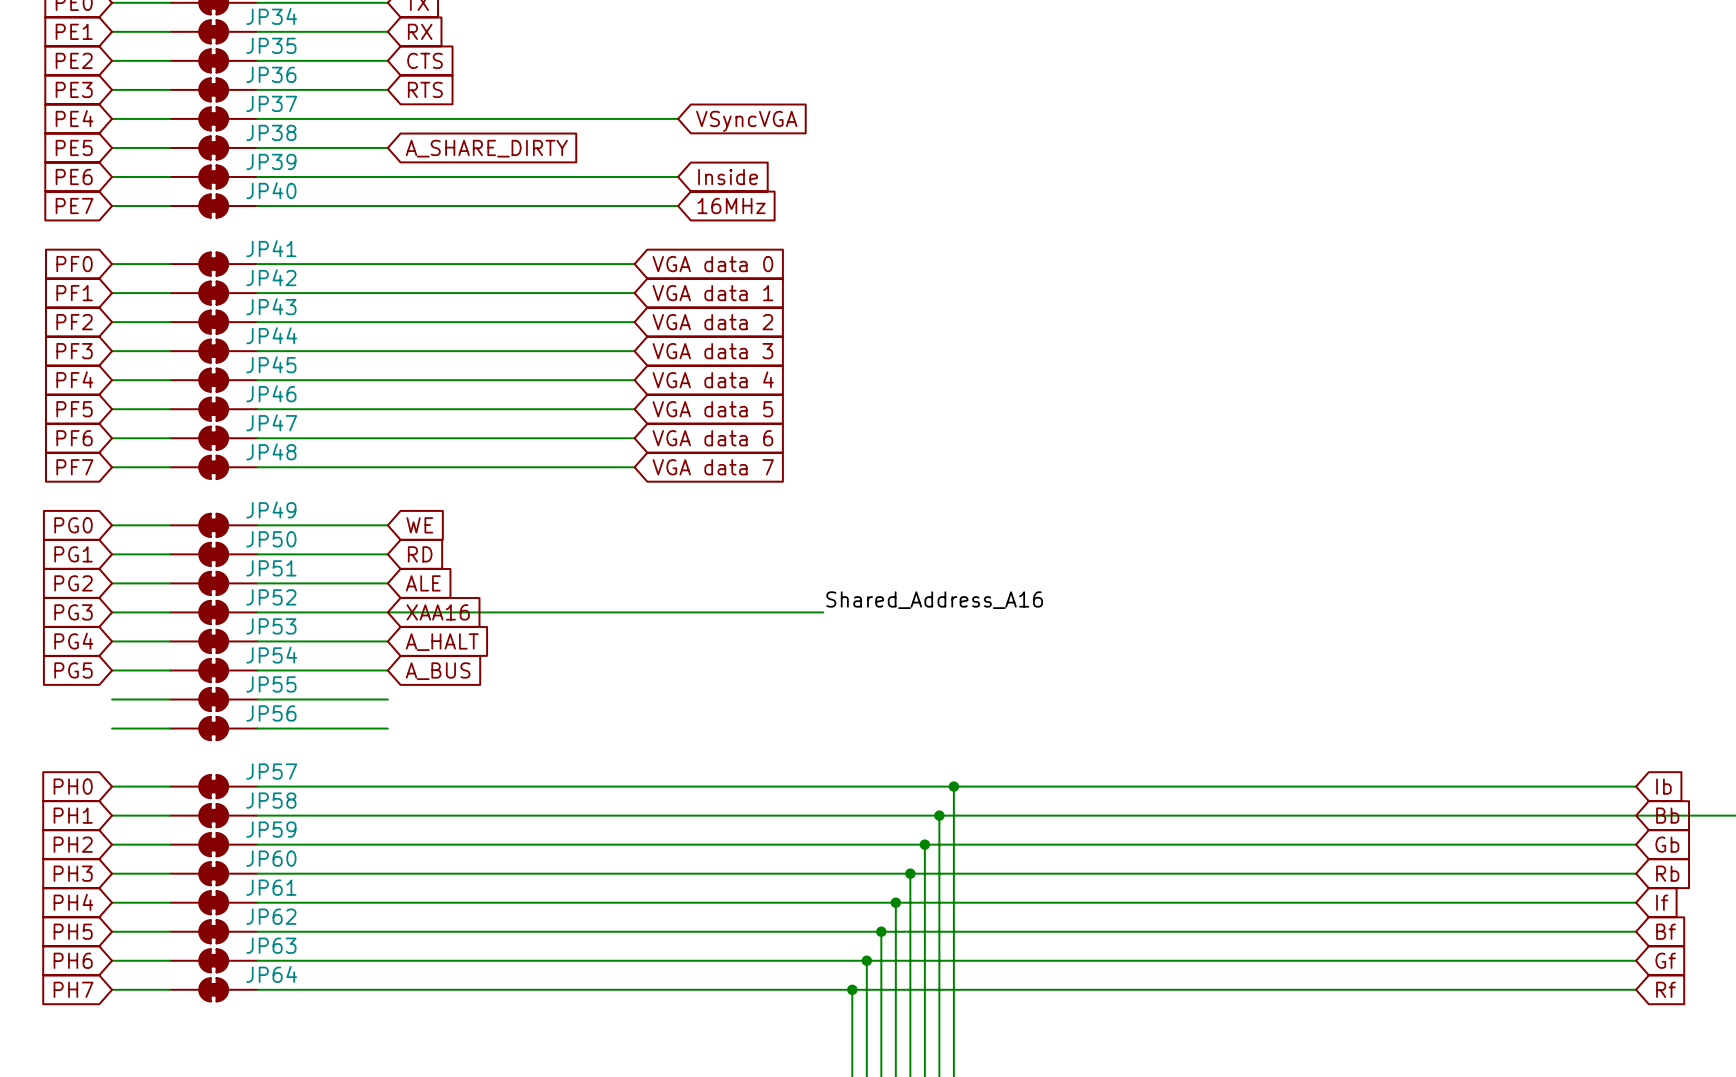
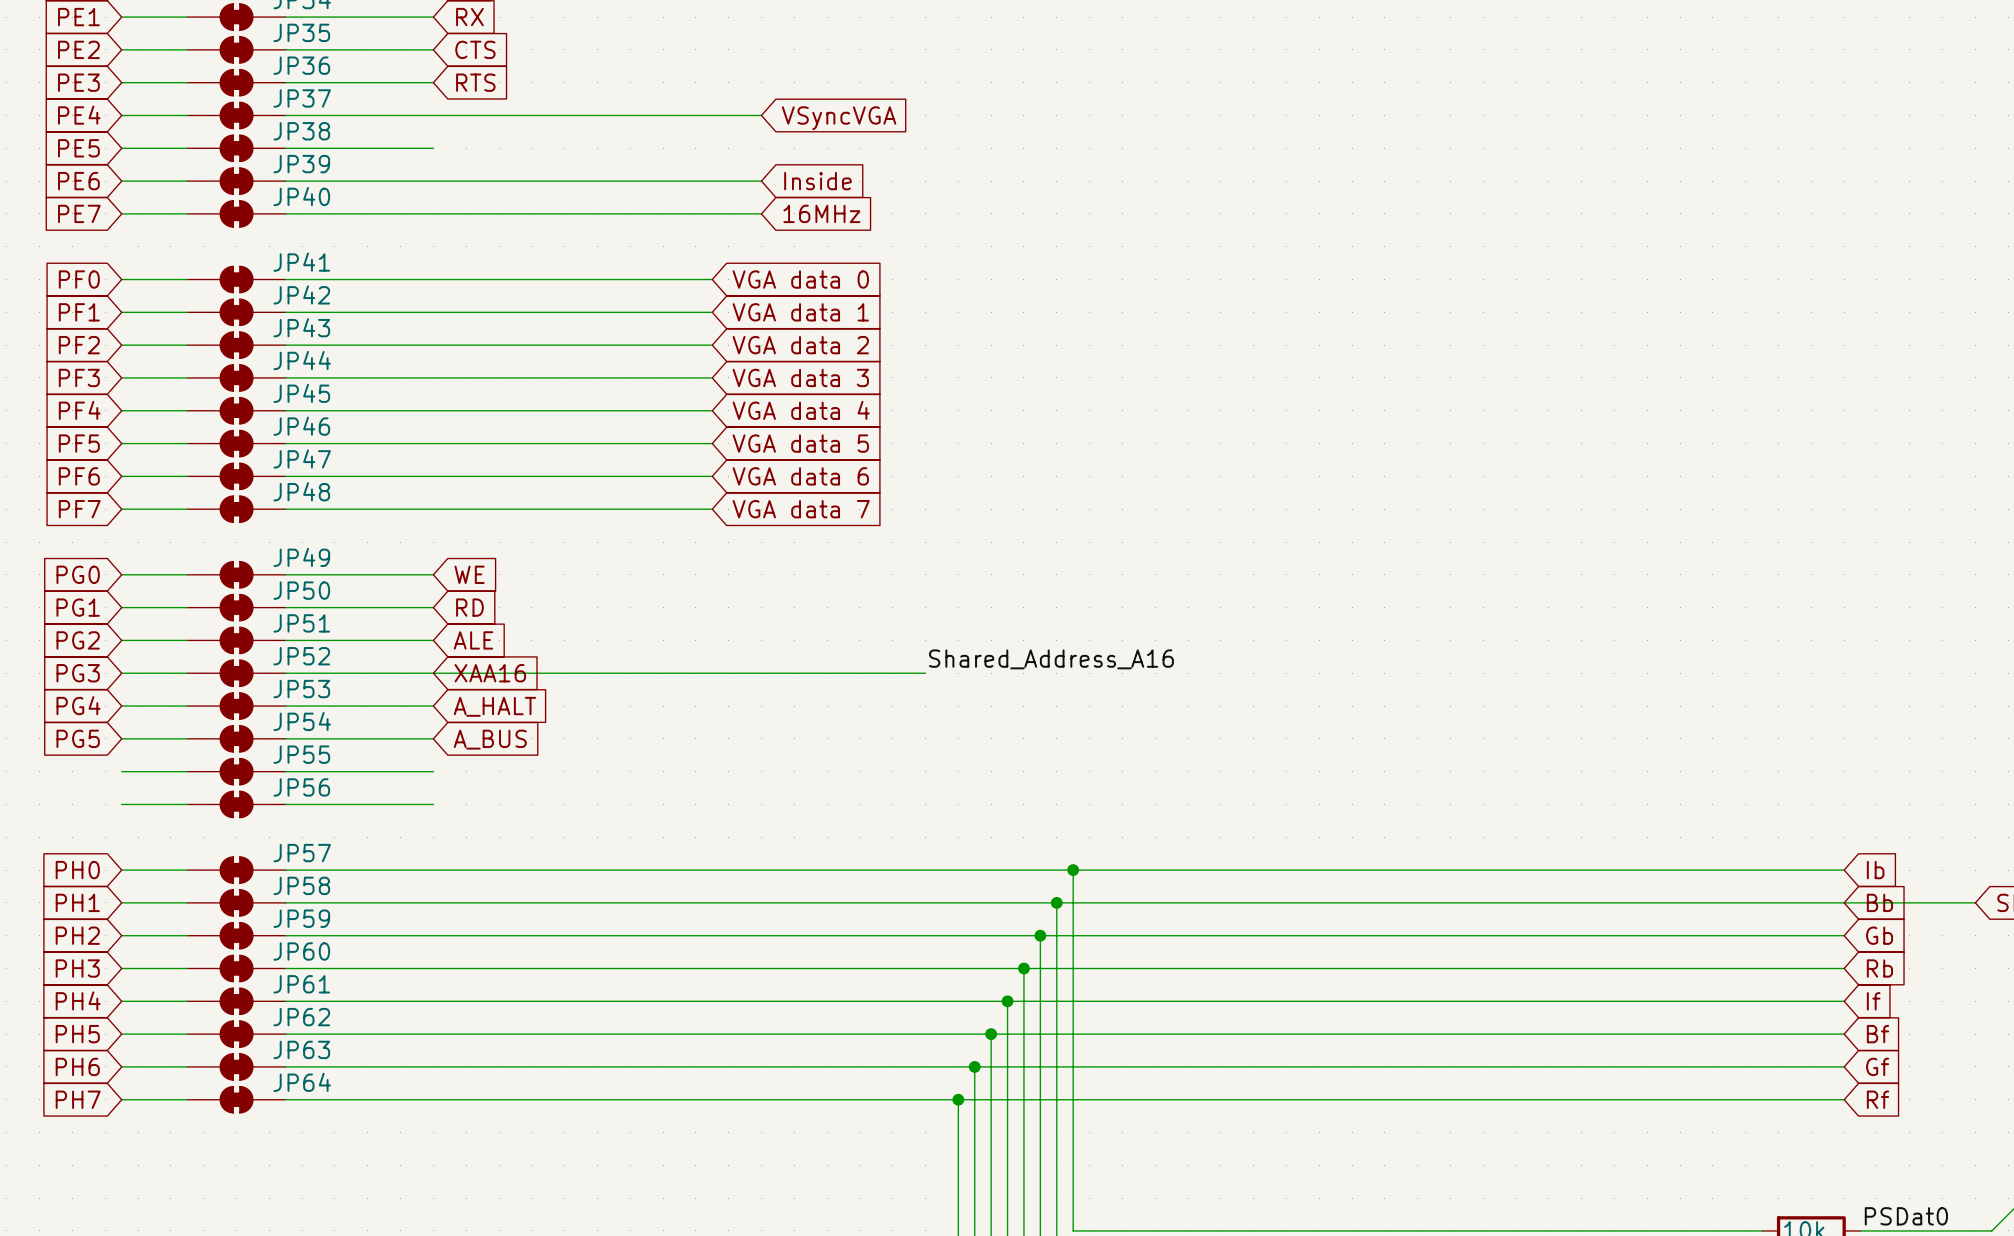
global label: A_SHARE_DIRTY (486, 148) -> none

